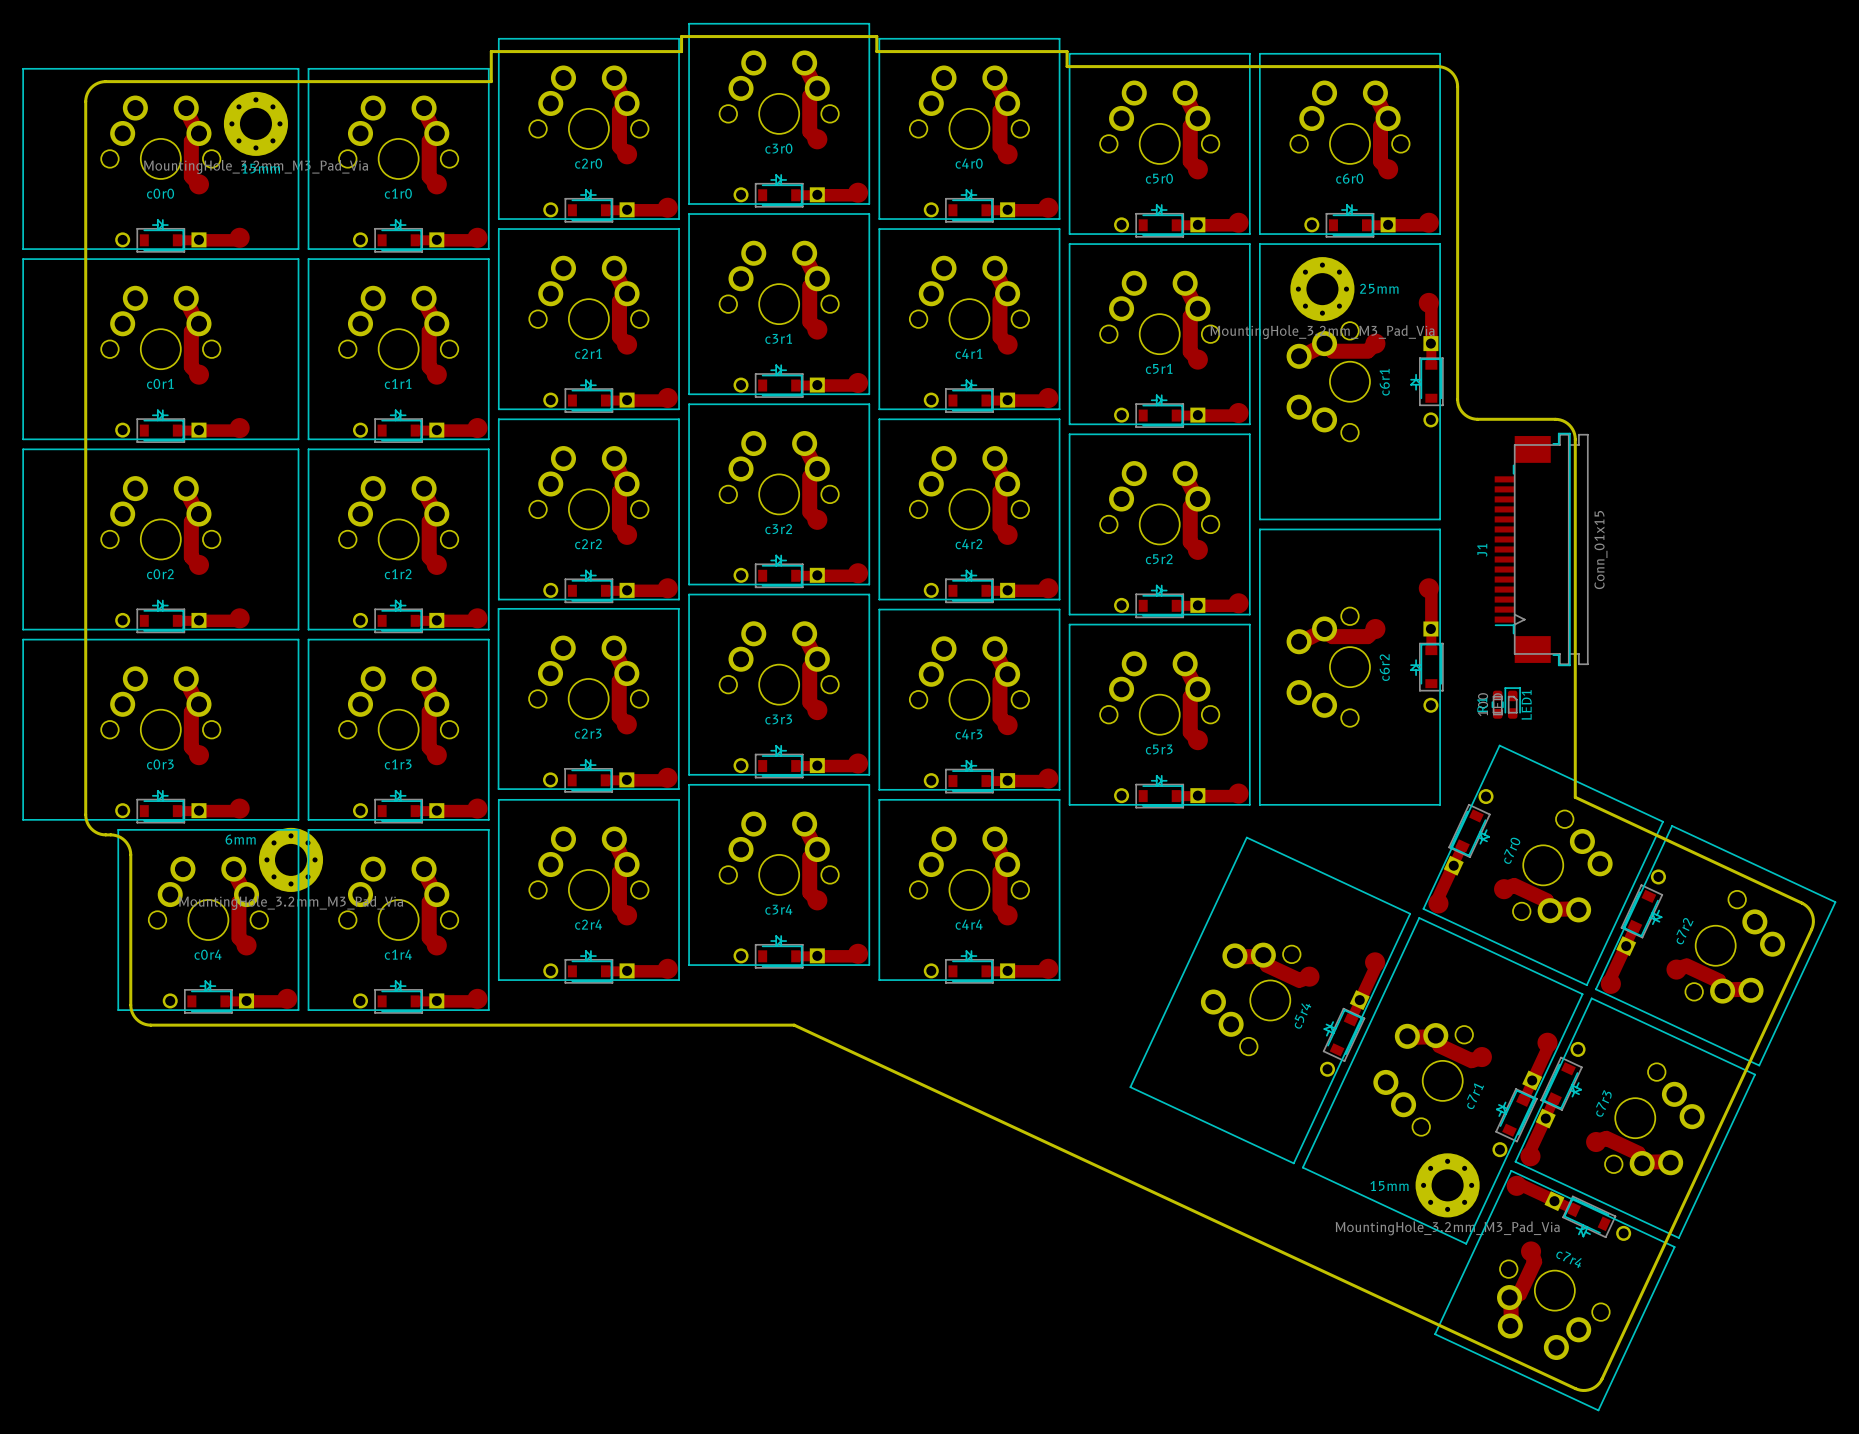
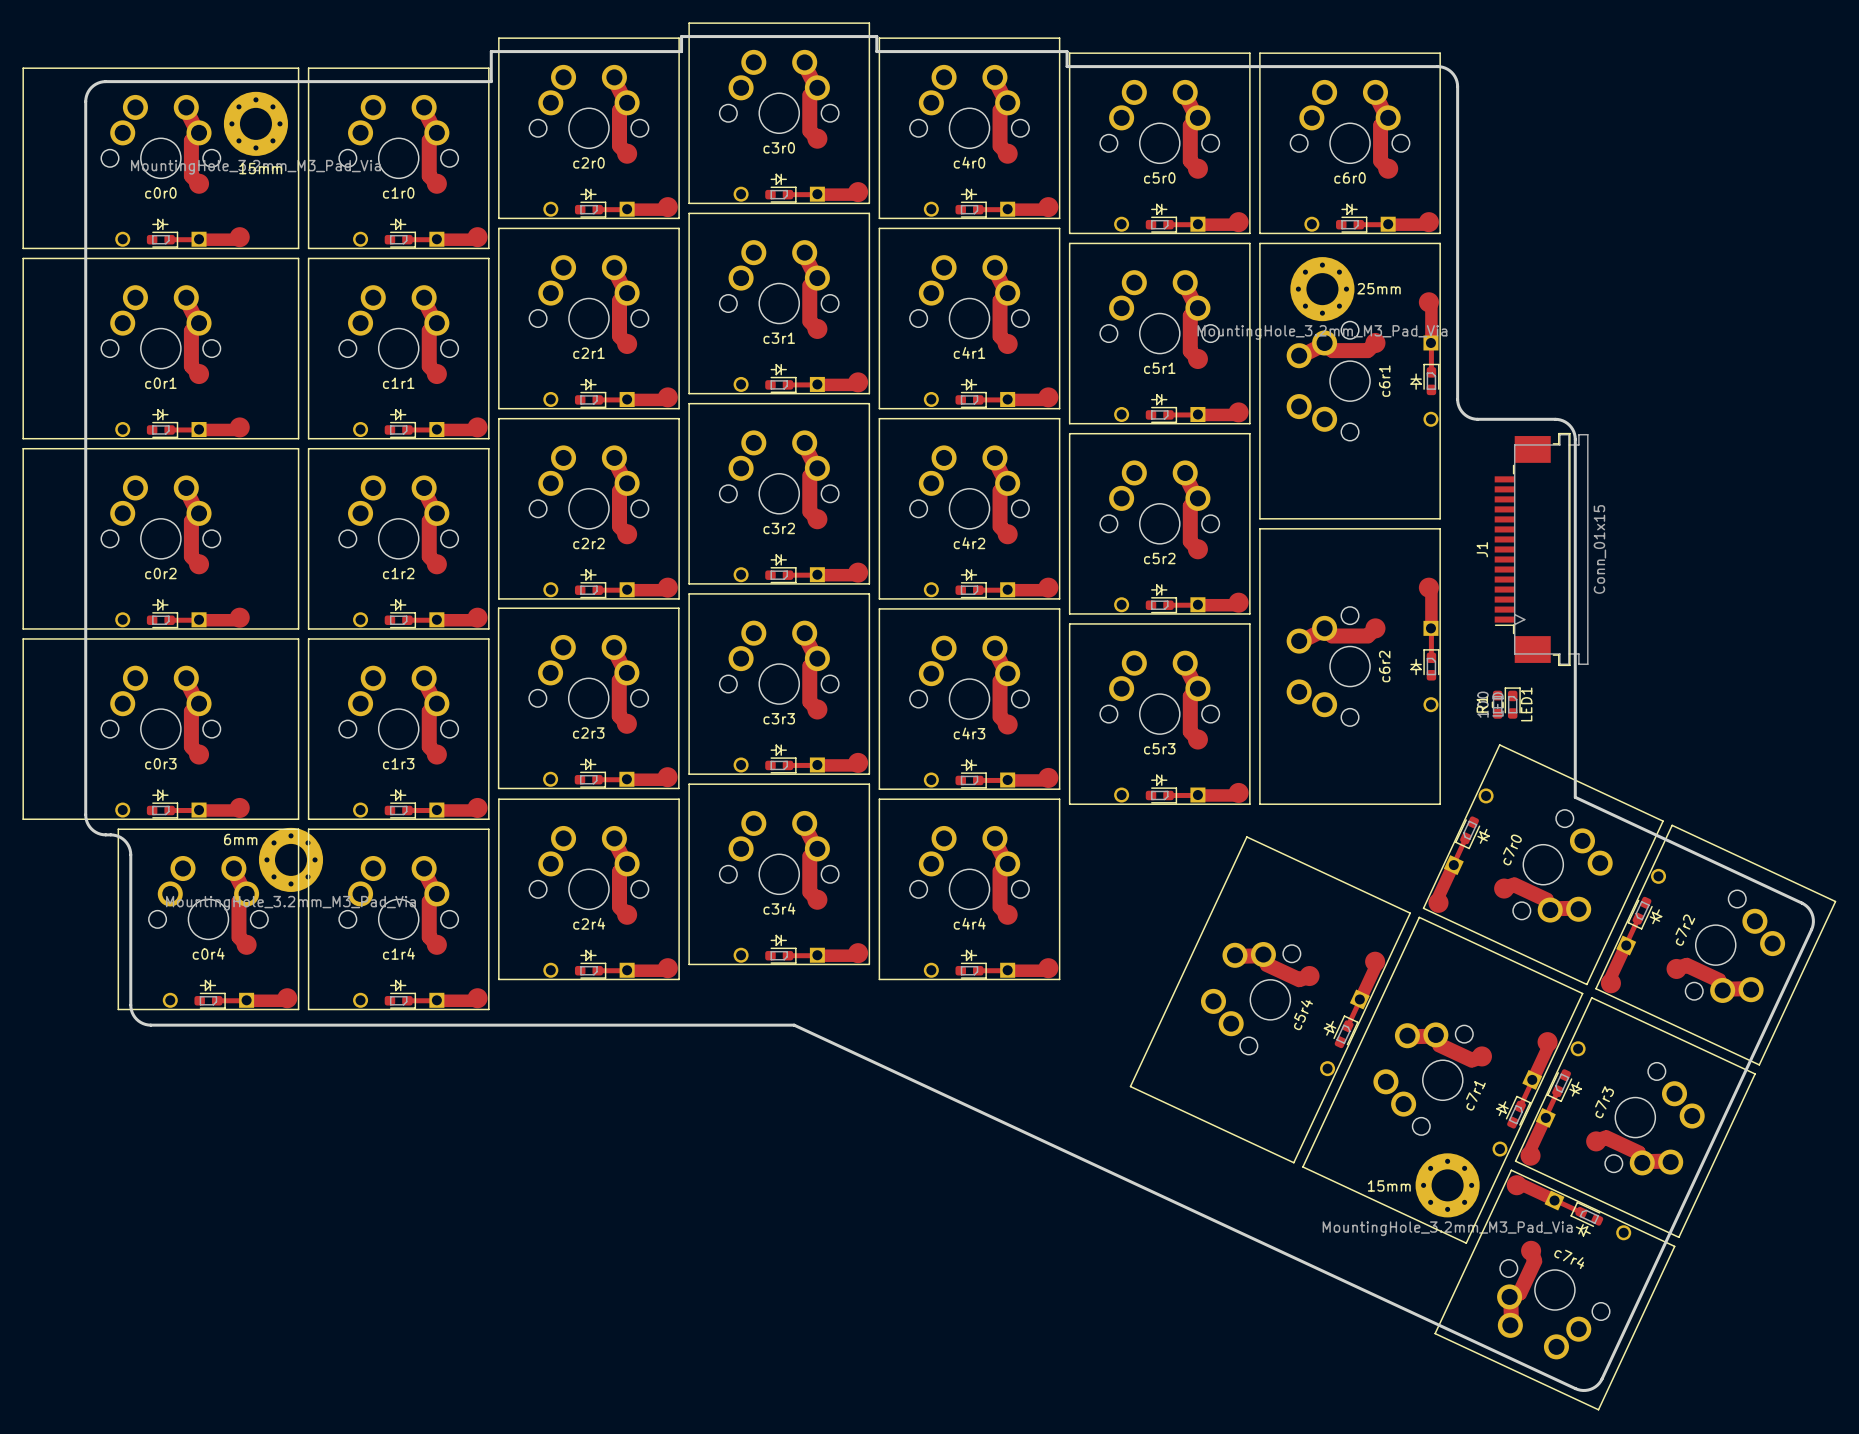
c3r0 footprint: [688, 23, 871, 208] -> [688, 22, 871, 205]
c2r0 footprint: [498, 38, 680, 223] -> [498, 37, 680, 220]
c4r0 footprint: [878, 38, 1061, 223] -> [878, 37, 1061, 220]
c5r0 footprint: [1068, 53, 1251, 238] -> [1068, 52, 1251, 235]
c6r0 footprint: [1259, 53, 1441, 238] -> [1259, 52, 1441, 235]
c0r0 footprint: [22, 68, 300, 253] -> [22, 67, 300, 250]
c1r0 footprint: [307, 68, 490, 253] -> [307, 67, 490, 250]
c3r1 footprint: [688, 213, 871, 398] -> [688, 212, 871, 395]
c2r1 footprint: [498, 228, 680, 413] -> [498, 227, 680, 410]
c4r1 footprint: [878, 228, 1061, 413] -> [878, 227, 1061, 410]
c5r1 footprint: [1068, 243, 1251, 428] -> [1068, 242, 1251, 425]
c6r1 footprint: [1259, 243, 1444, 521] -> [1259, 242, 1441, 520]
c0r1 footprint: [22, 258, 300, 443] -> [22, 257, 300, 440]
c1r1 footprint: [307, 258, 490, 443] -> [307, 257, 490, 440]
c3r2 footprint: [688, 403, 871, 588] -> [688, 402, 871, 585]
c2r2 footprint: [498, 418, 680, 603] -> [498, 417, 680, 600]
c4r2 footprint: [878, 418, 1061, 603] -> [878, 417, 1061, 600]
c5r2 footprint: [1068, 433, 1251, 618] -> [1068, 432, 1251, 615]
c0r2 footprint: [22, 448, 300, 633] -> [22, 447, 300, 630]
c1r2 footprint: [307, 448, 490, 633] -> [307, 447, 490, 630]
c6r2 footprint: [1259, 528, 1444, 806] -> [1259, 528, 1441, 805]
c3r3 footprint: [688, 593, 871, 778] -> [688, 593, 871, 775]
c2r3 footprint: [497, 608, 680, 793] -> [497, 607, 680, 790]
c4r3 footprint: [878, 608, 1061, 793] -> [878, 608, 1061, 790]
c5r3 footprint: [1068, 623, 1251, 808] -> [1068, 623, 1251, 805]
c0r3 footprint: [22, 638, 300, 823] -> [22, 638, 300, 820]
c1r3 footprint: [307, 638, 490, 823] -> [307, 638, 490, 820]
c7r0 footprint: [1422, 744, 1664, 986] -> [1422, 744, 1664, 986]
c3r4 footprint: [688, 784, 871, 969] -> [688, 783, 871, 966]
c2r4 footprint: [498, 799, 680, 984] -> [498, 798, 680, 981]
c4r4 footprint: [878, 799, 1061, 984] -> [878, 798, 1061, 981]
c7r2 footprint: [1595, 825, 1837, 1067] -> [1595, 824, 1837, 1066]
c0r4 footprint: [117, 829, 300, 1014] -> [117, 828, 300, 1011]
c1r4 footprint: [307, 829, 490, 1014] -> [307, 828, 490, 1011]
c5r4 footprint: [1129, 836, 1411, 1165] -> [1129, 836, 1411, 1164]
c7r1 footprint: [1302, 917, 1584, 1245] -> [1302, 916, 1584, 1244]
c7r3 footprint: [1514, 997, 1756, 1239] -> [1514, 997, 1756, 1239]
c7r4 footprint: [1434, 1170, 1676, 1412] -> [1434, 1169, 1676, 1411]

